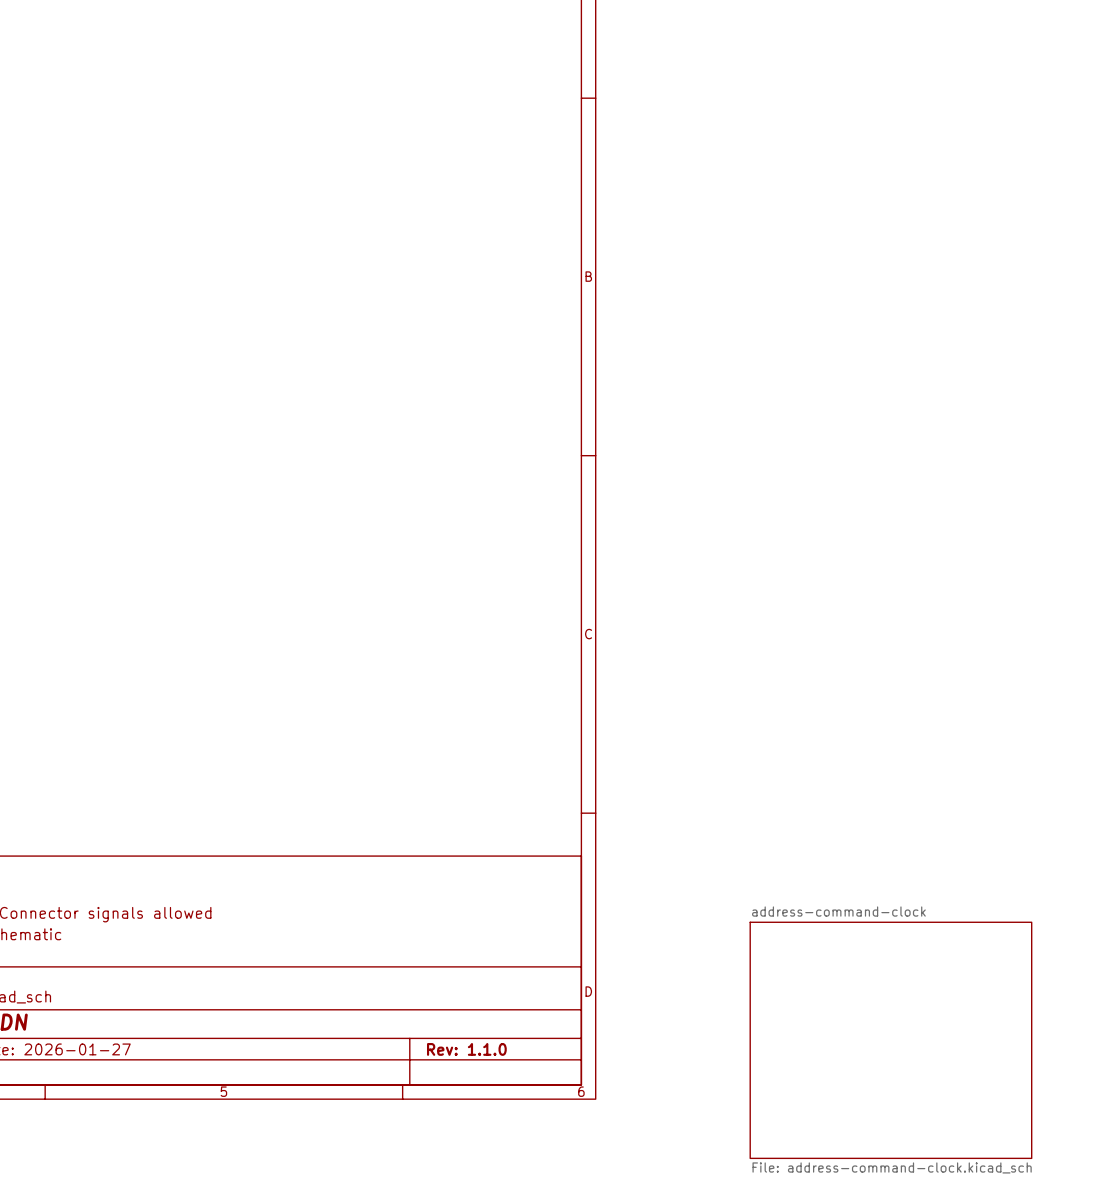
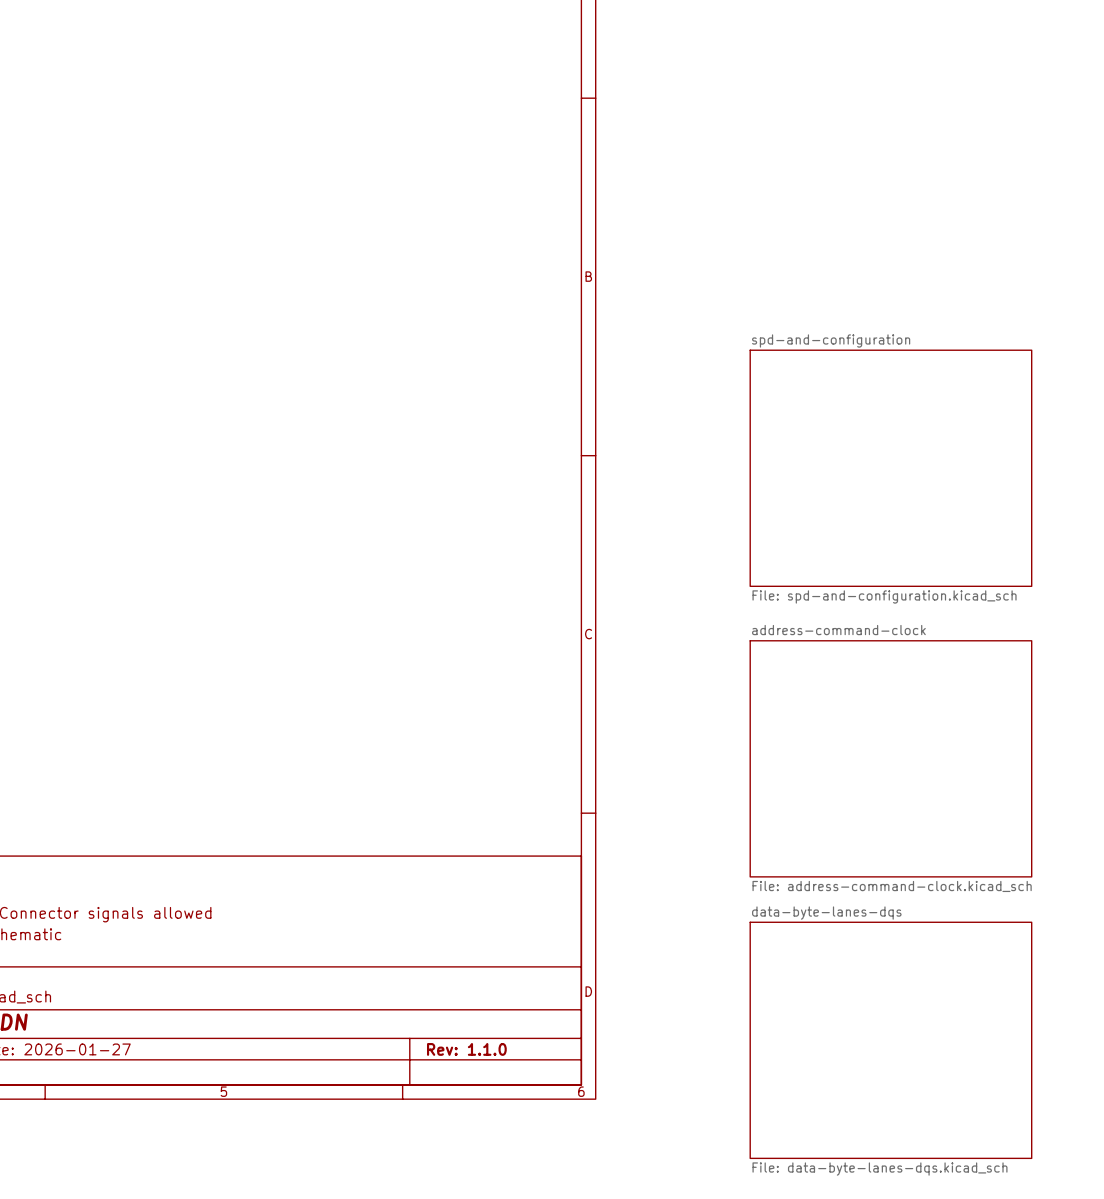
sheet spd-and-configuration: none -> File: spd-and-configuration.kicad_sch (890, 468)
sheet address-command-clock: none -> File: address-command-clock.kicad_sch (890, 758)
sheet address-command-clock name: address-command-clock (838, 911) -> data-byte-lanes-dqs (826, 913)
sheet address-command-clock value: File: address-command-clock.kicad_sch (892, 1167) -> File: data-byte-lanes-dqs.kicad_sch (879, 1169)

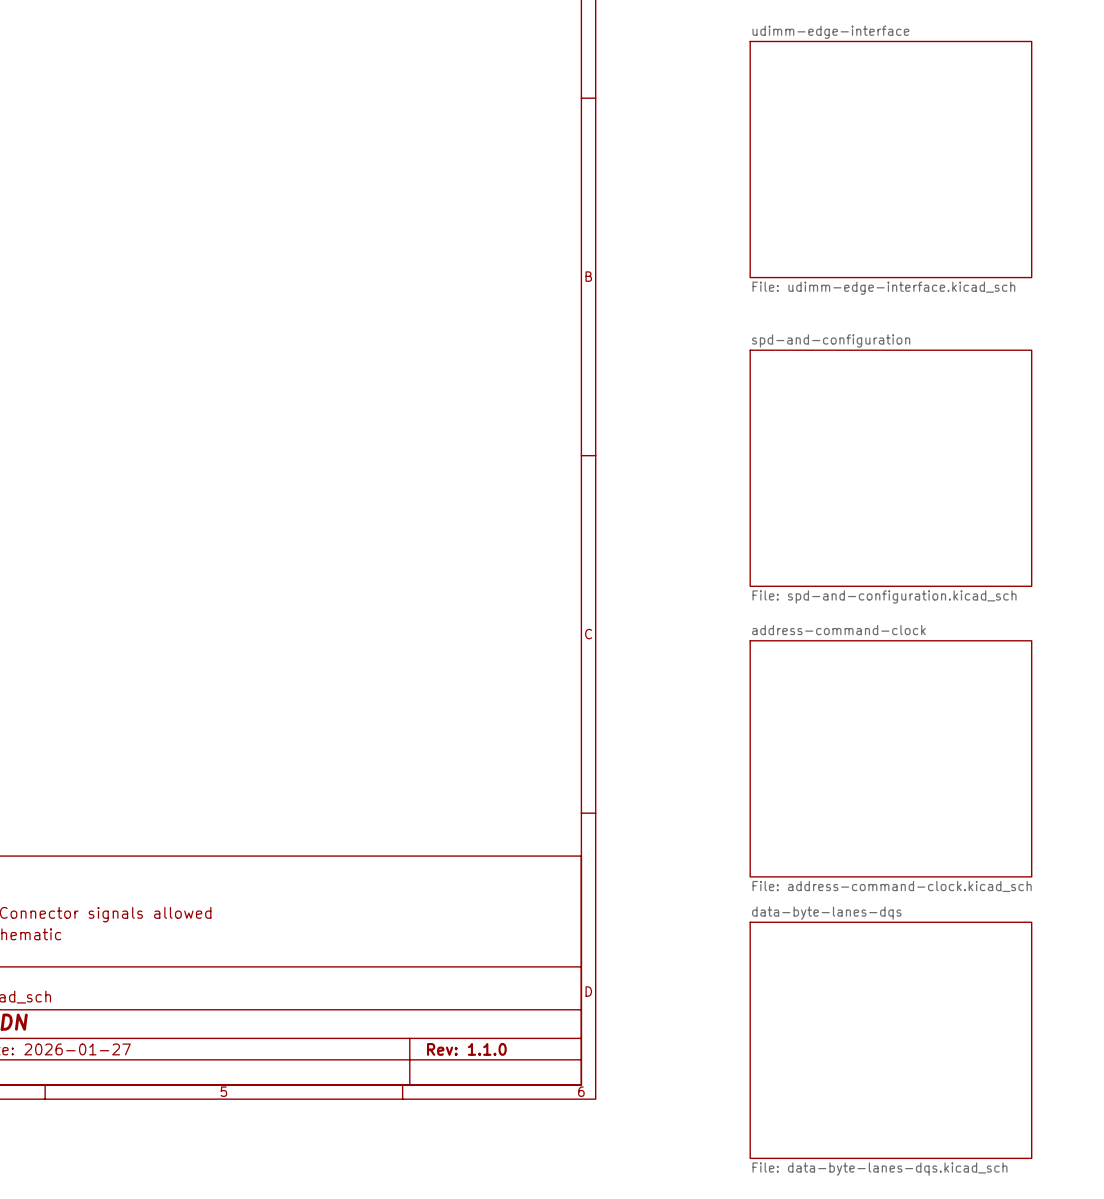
sheet udimm-edge-interface: none -> File: udimm-edge-interface.kicad_sch (890, 159)

